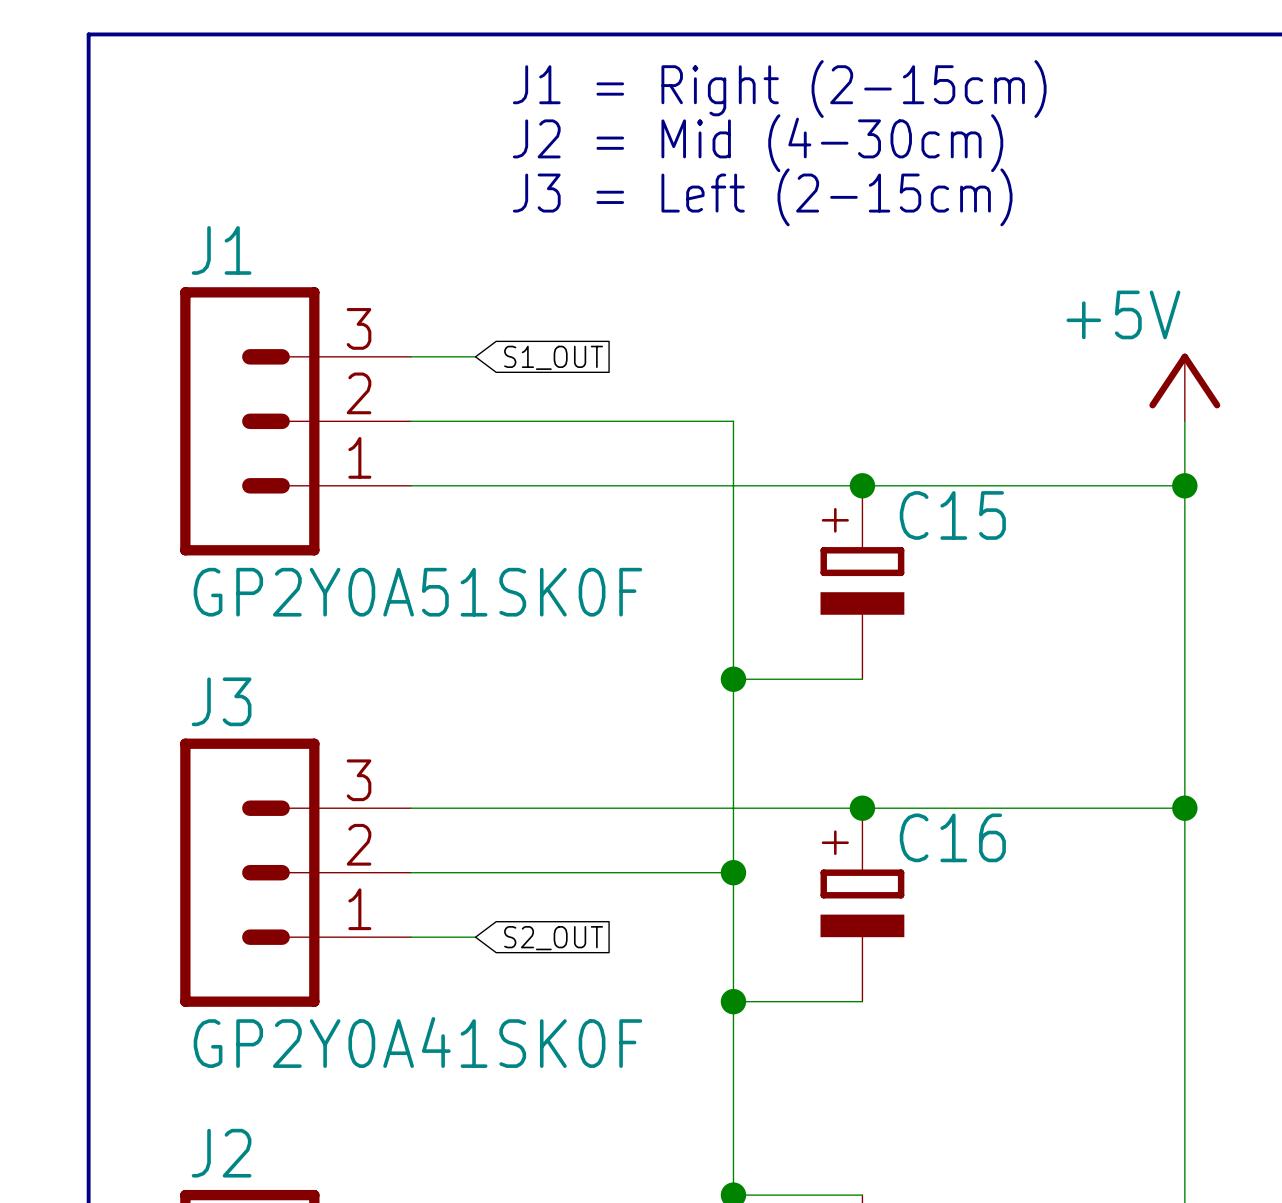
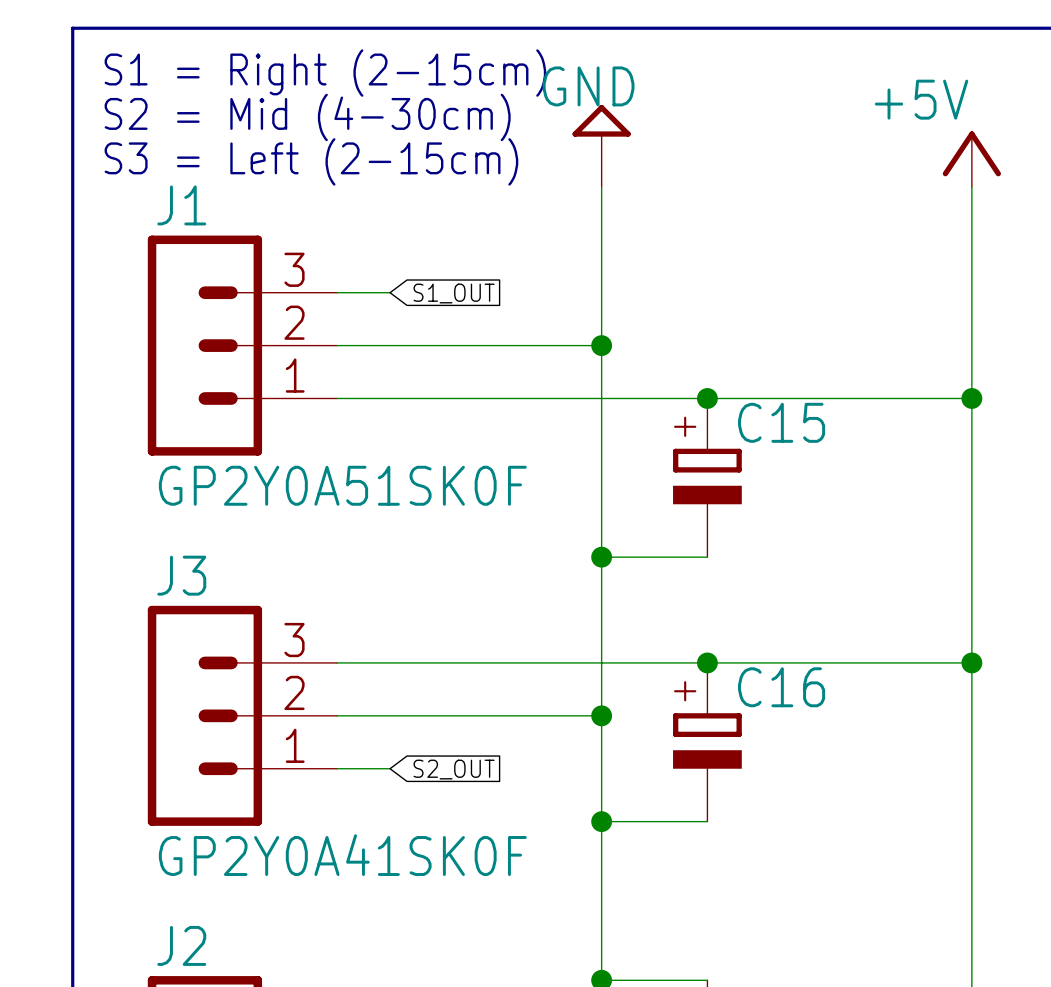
text: J1 = Right (2-15cm) (779, 89) -> S1 = Right (2-15cm) (325, 73)
text: J2 = Mid (4-30cm) (758, 143) -> S2 = Mid (4-30cm) (307, 117)
power symbol: none -> GND (601, 145)
text: J3 = Left (2-15cm) (762, 197) -> S3 = Left (2-15cm) (311, 161)
wire: none -> (601, 186) (601, 345)
wire: none -> (971, 186) (971, 345)
power symbol position: +5V (1184, 387) -> +5V (971, 159)
junction: none -> (601, 345)

